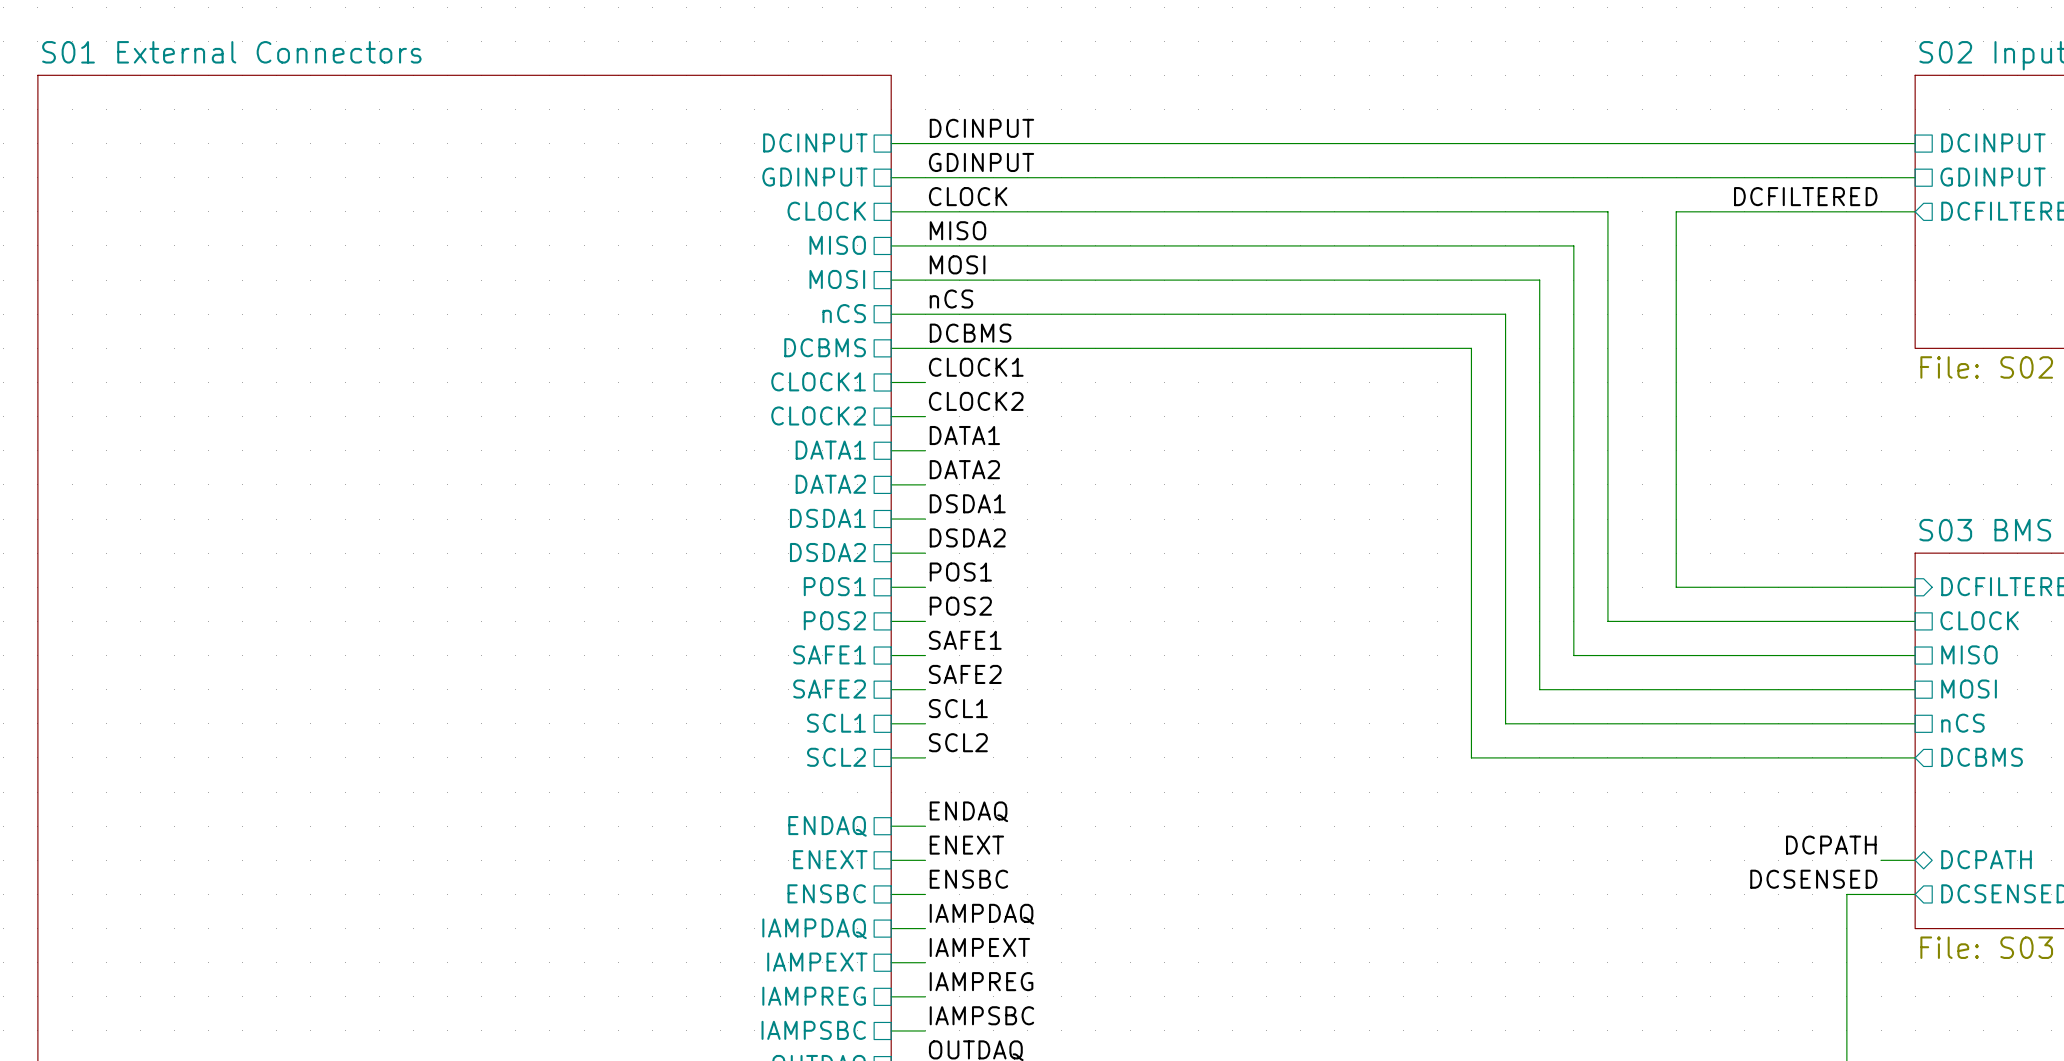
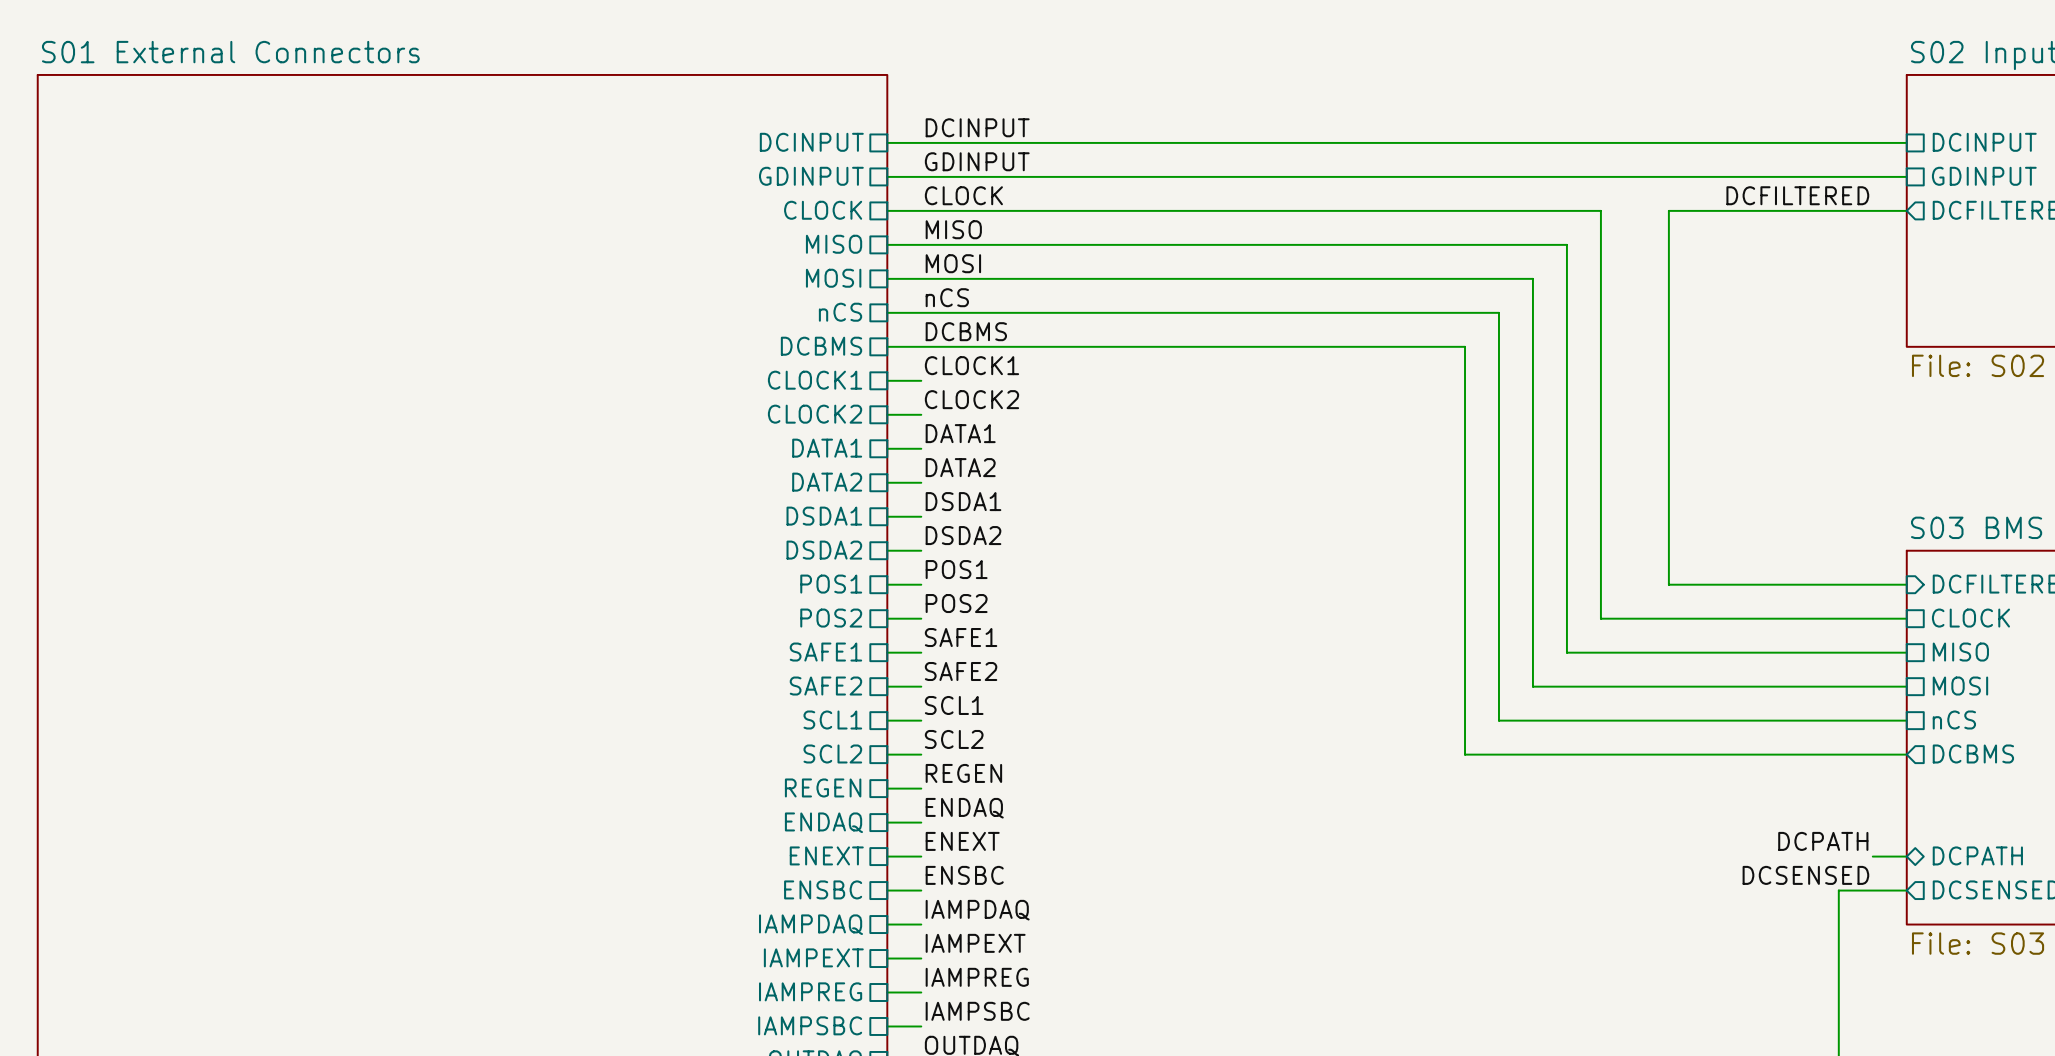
label: none -> REGEN (963, 773)
sheet pin: none -> REGEN (823, 787)
wire: none -> (887, 788) (921, 788)

